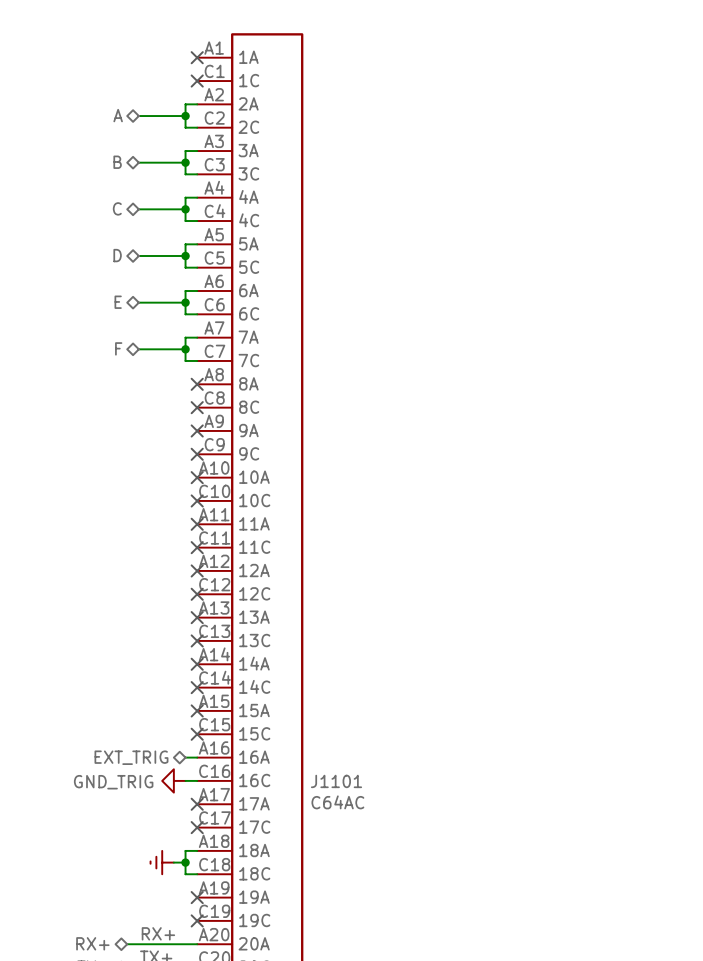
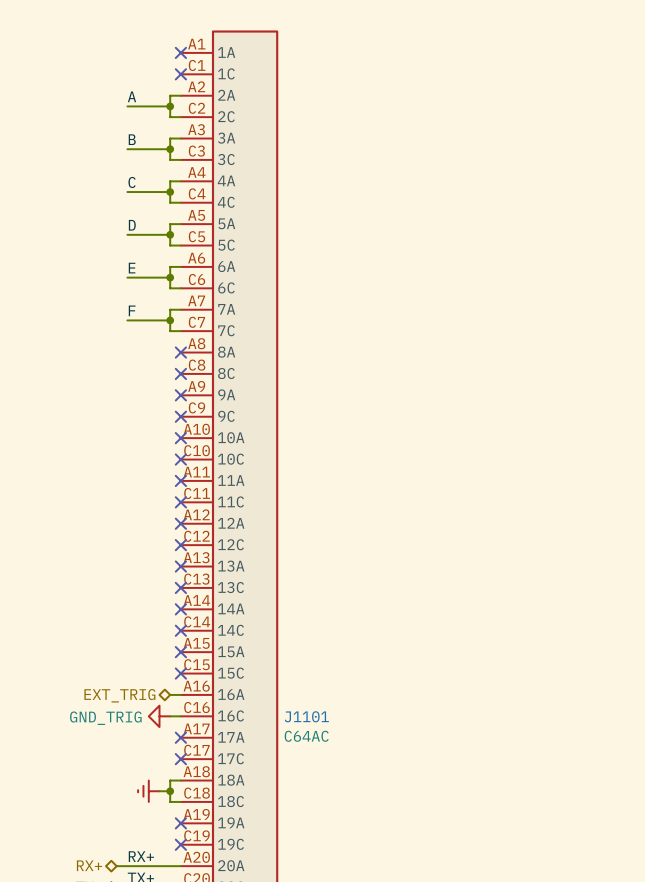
label: none -> A (132, 96)
hierarchical label: A (118, 115) -> none
label: none -> B (132, 139)
hierarchical label: B (117, 162) -> none
label: none -> C (132, 182)
hierarchical label: C (117, 208) -> none
label: none -> D (132, 225)
hierarchical label: D (117, 255) -> none
label: none -> E (132, 268)
hierarchical label: E (118, 302) -> none
label: none -> F (132, 310)
hierarchical label: F (118, 348) -> none

